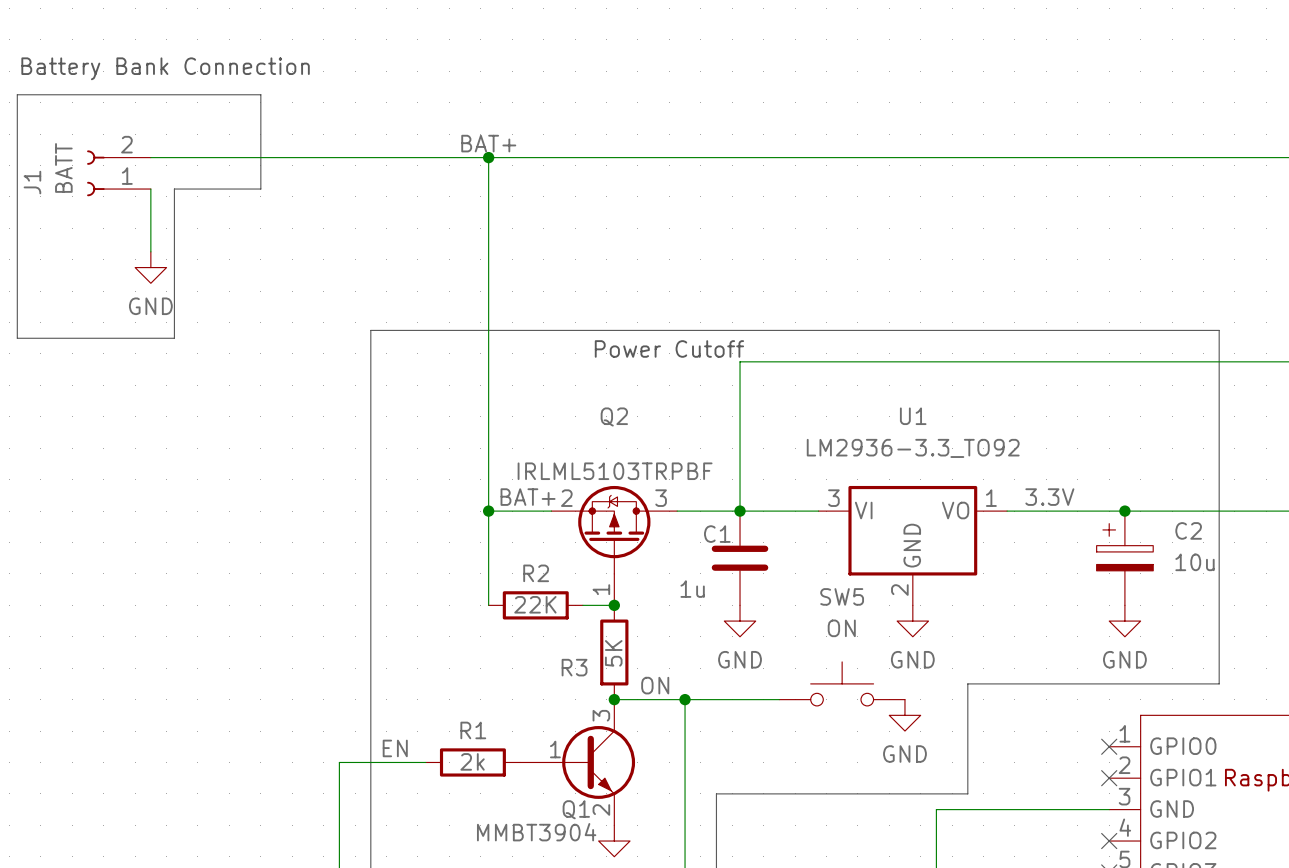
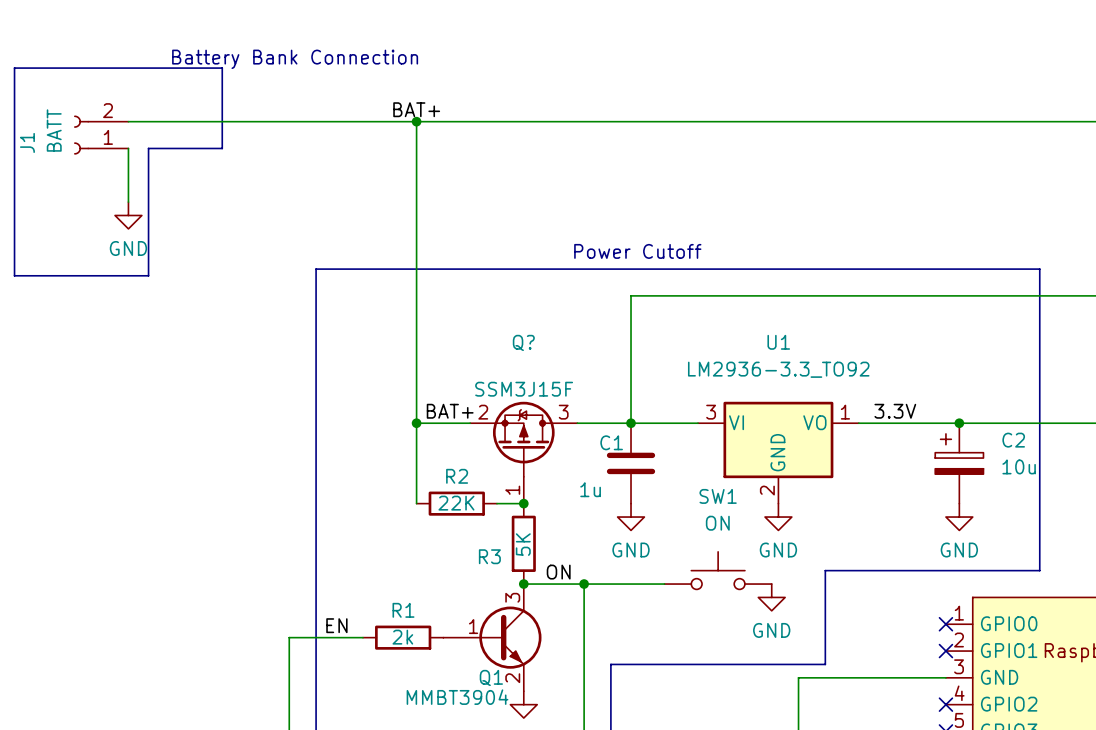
text position: Battery Bank Connection (165, 68) -> Battery Bank Connection (295, 59)
text position: Power Cutoff (669, 348) -> Power Cutoff (637, 251)
Q2 name: Q2 (614, 416) -> Q? (523, 342)
Q2 value: IRLML5103TRPBF (615, 471) -> SSM3J15F (524, 389)
SW5 name: SW5 (842, 596) -> SW1 (718, 496)

